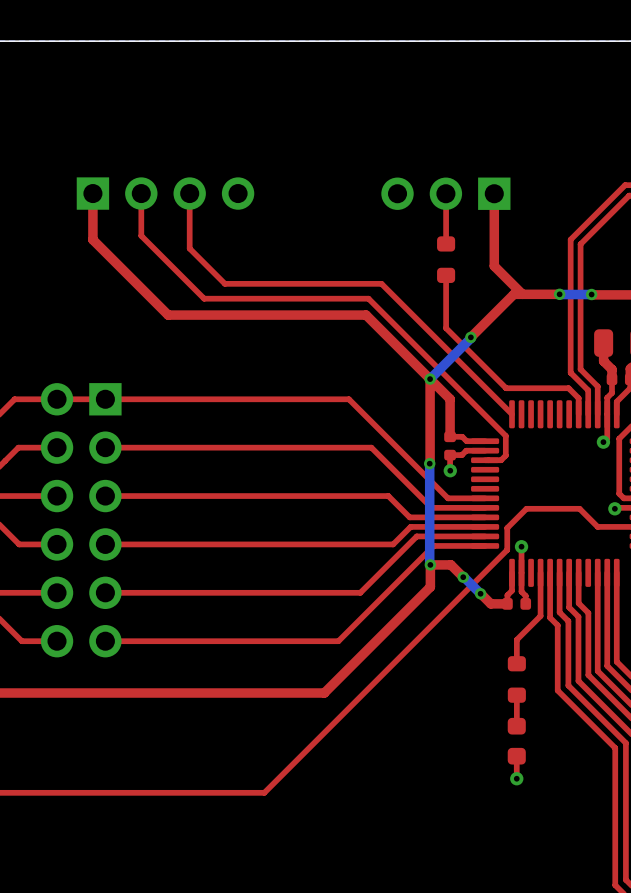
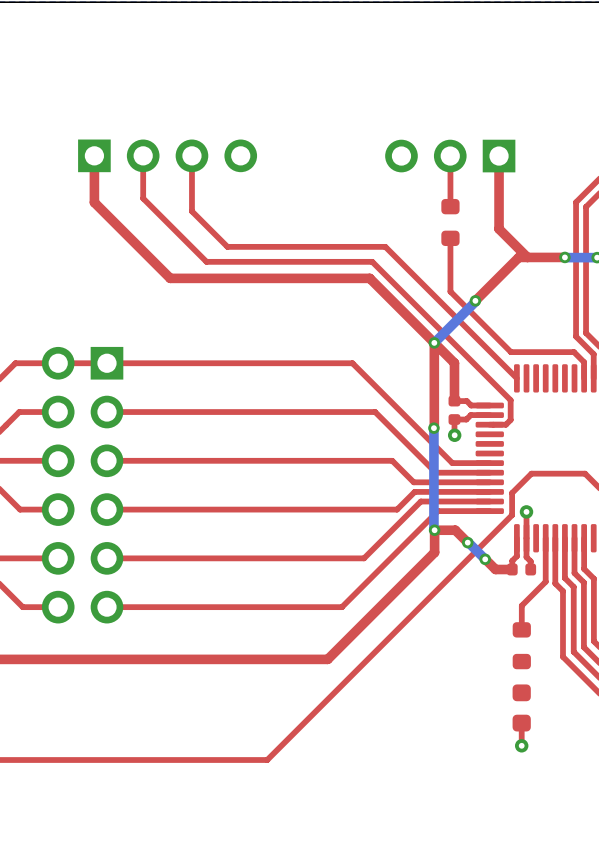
top track: (516, 695) (516, 726) -> none

